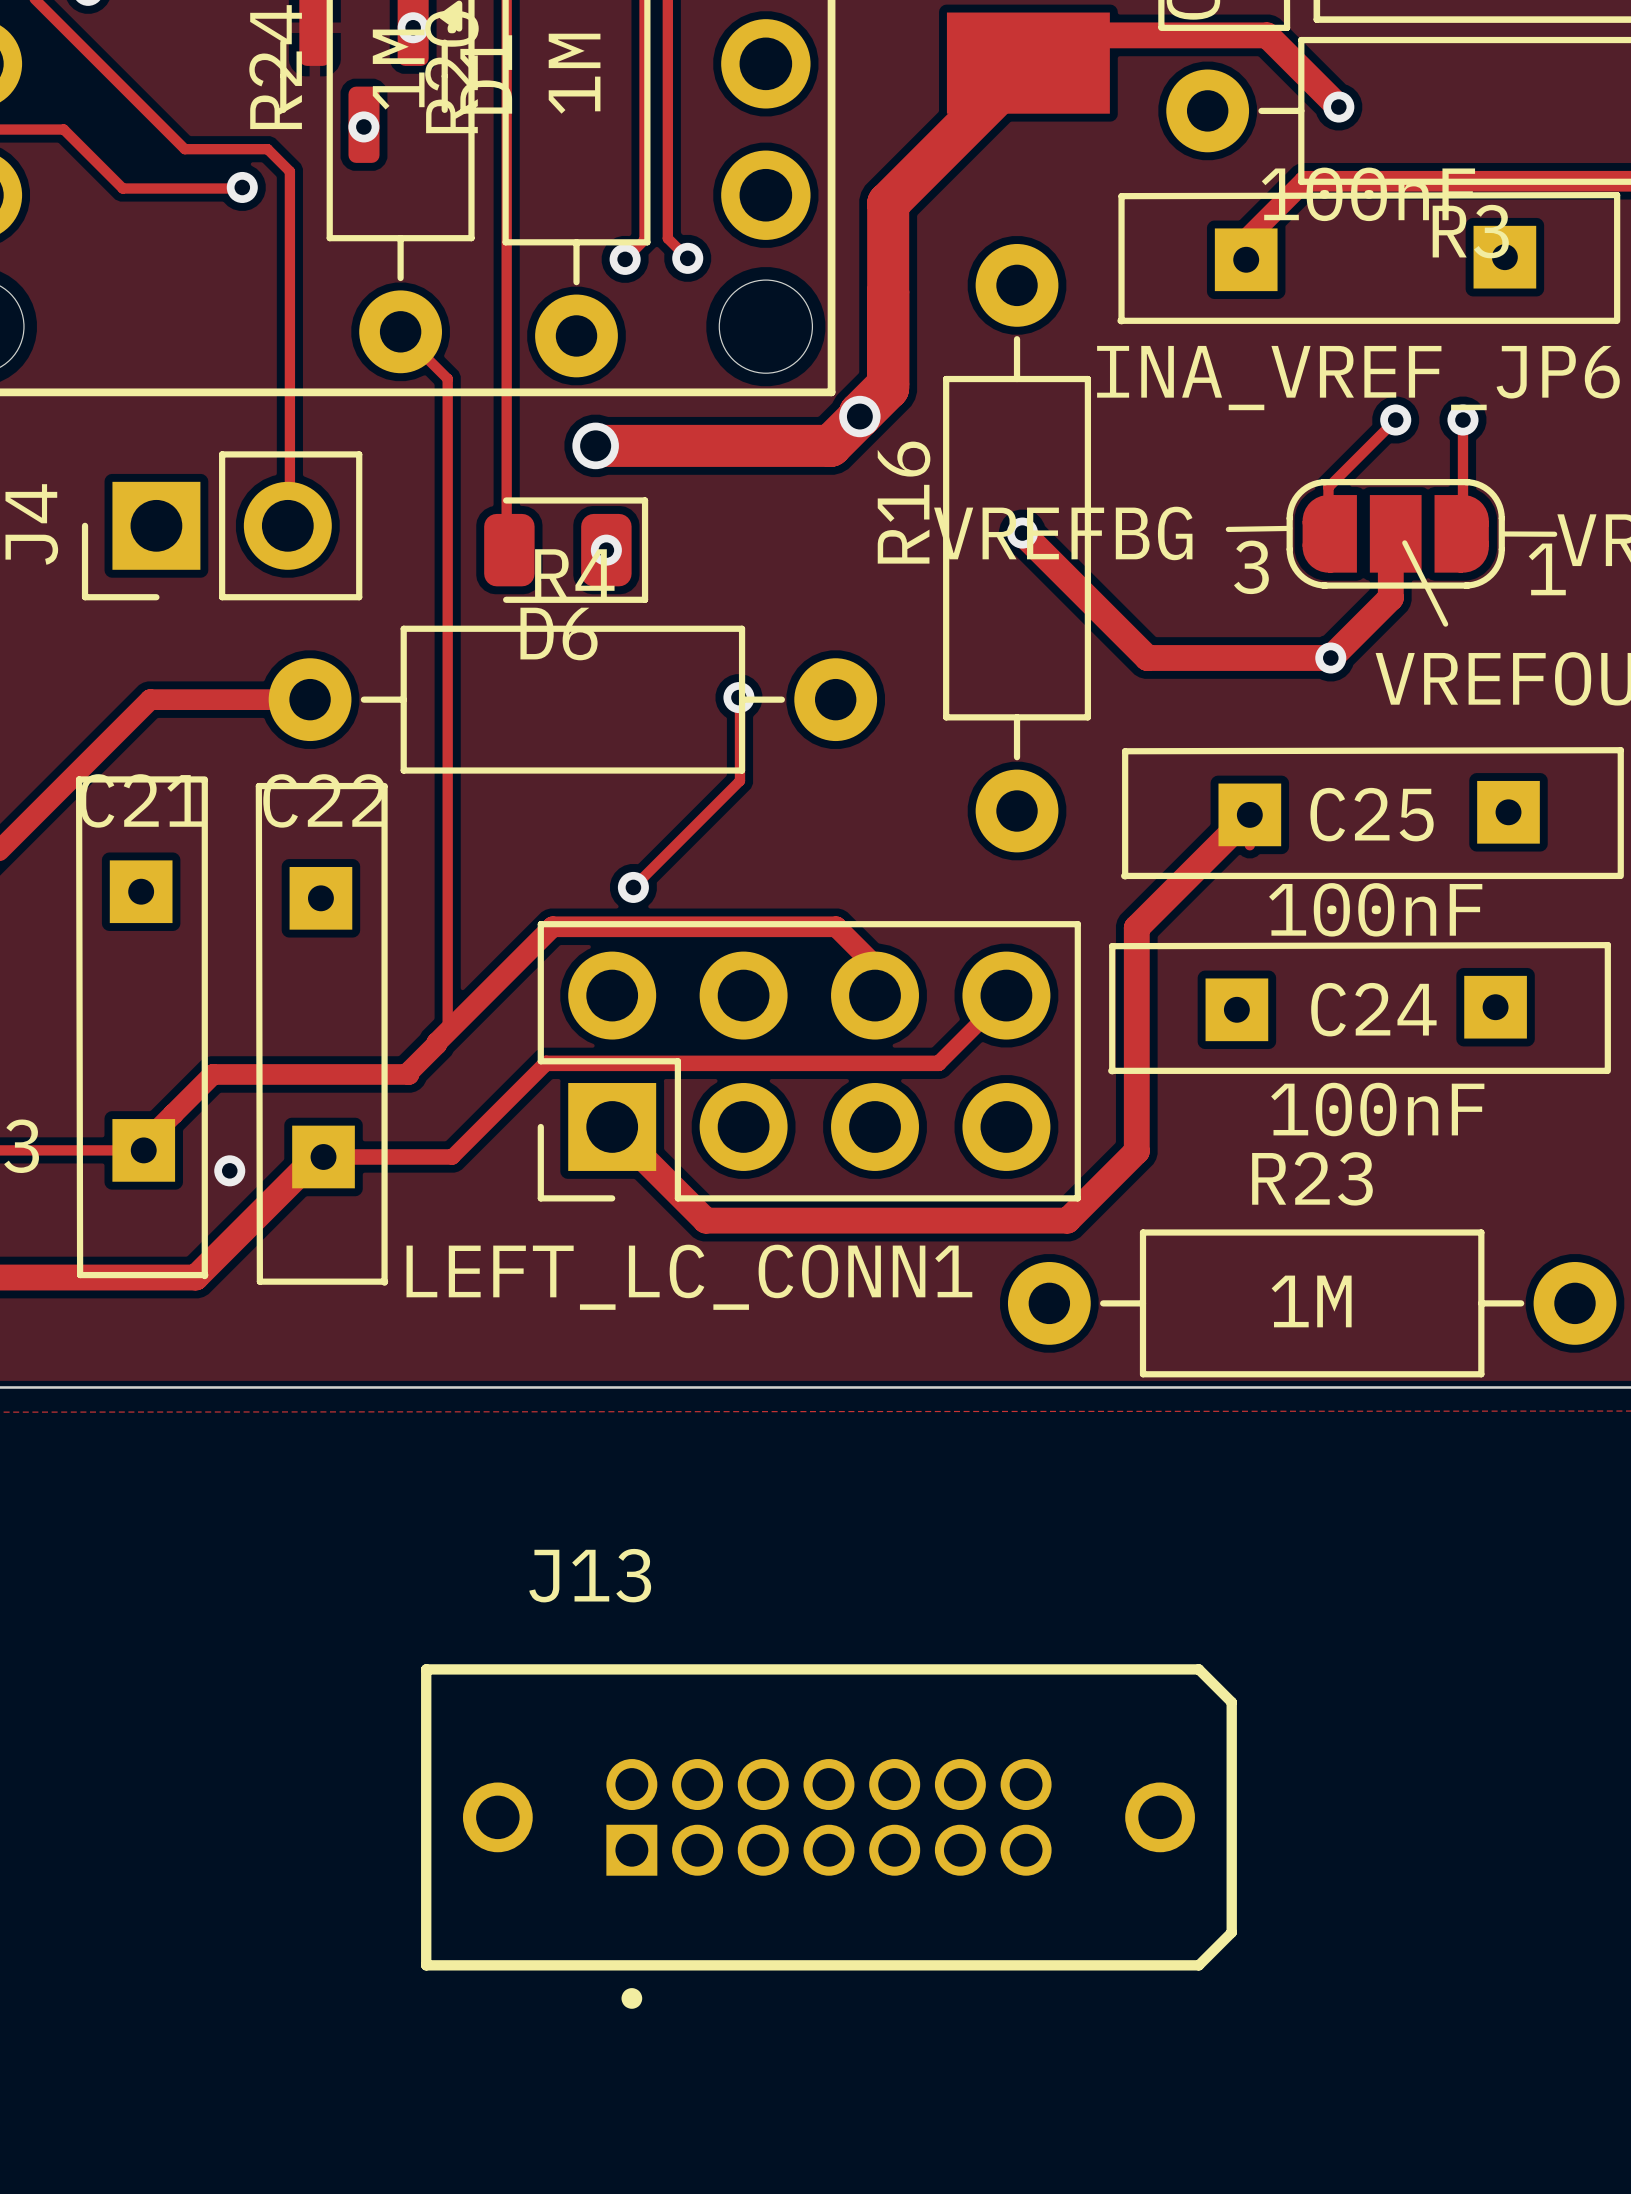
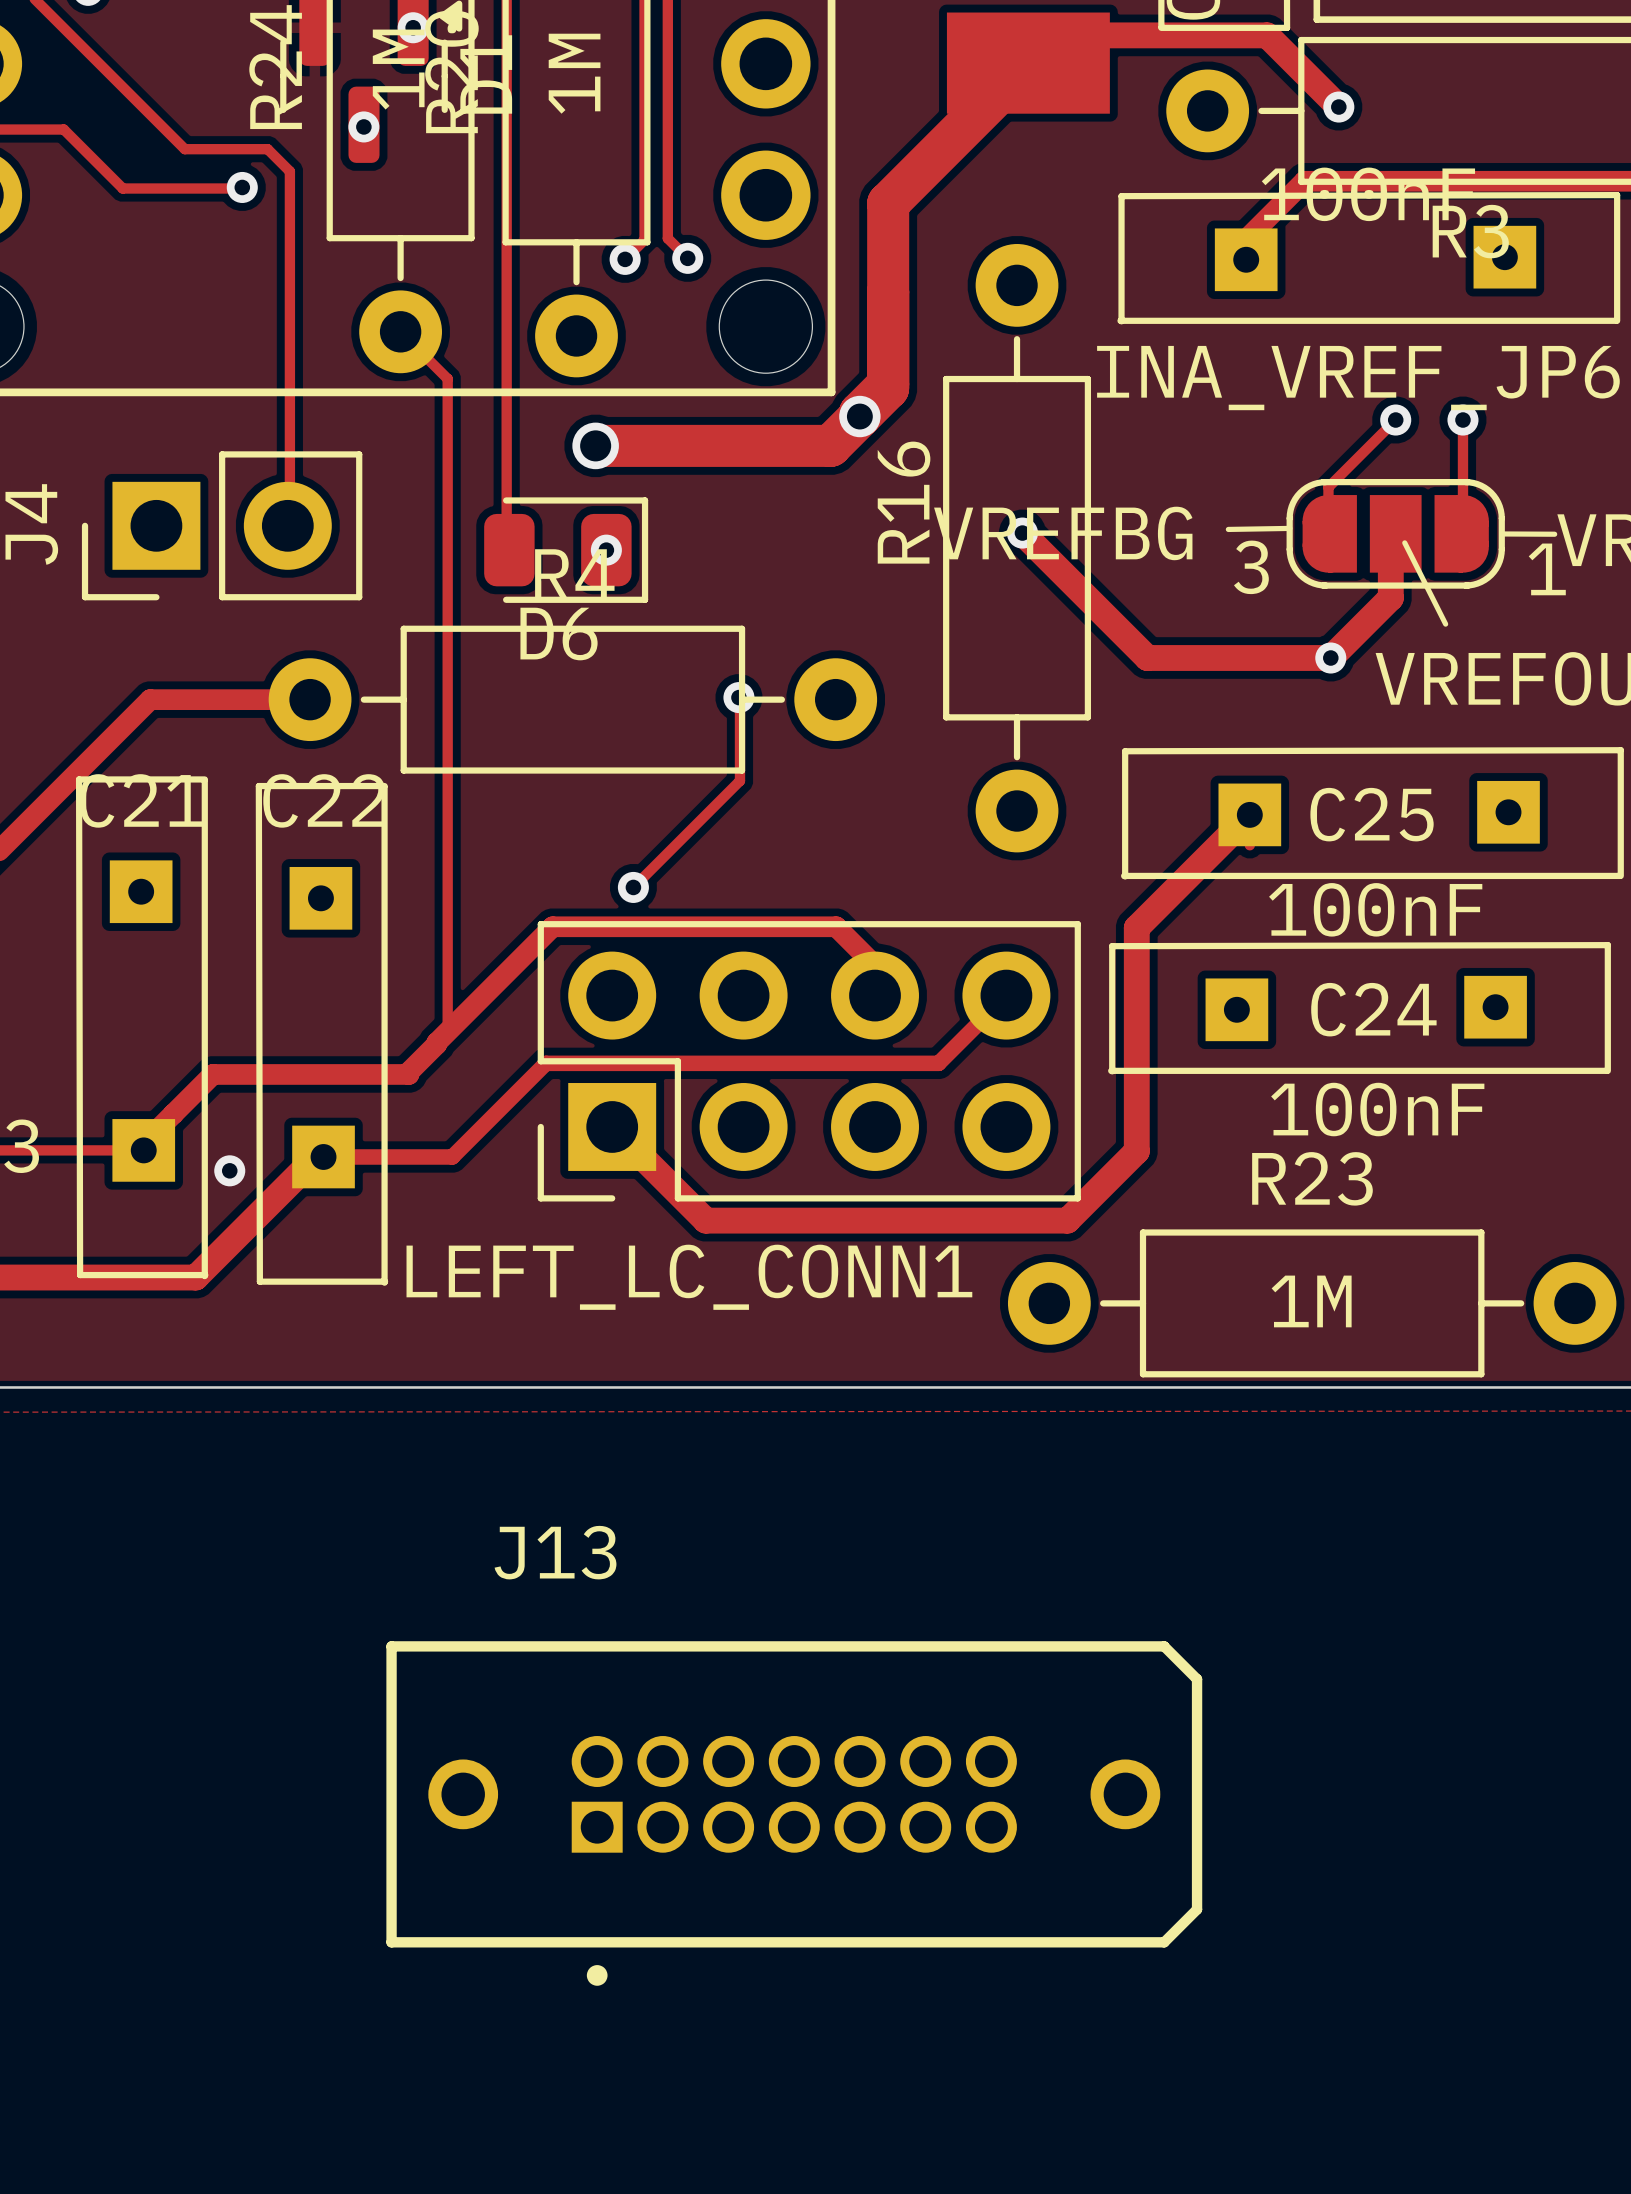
J13 position: (828, 1836) -> (794, 1813)

